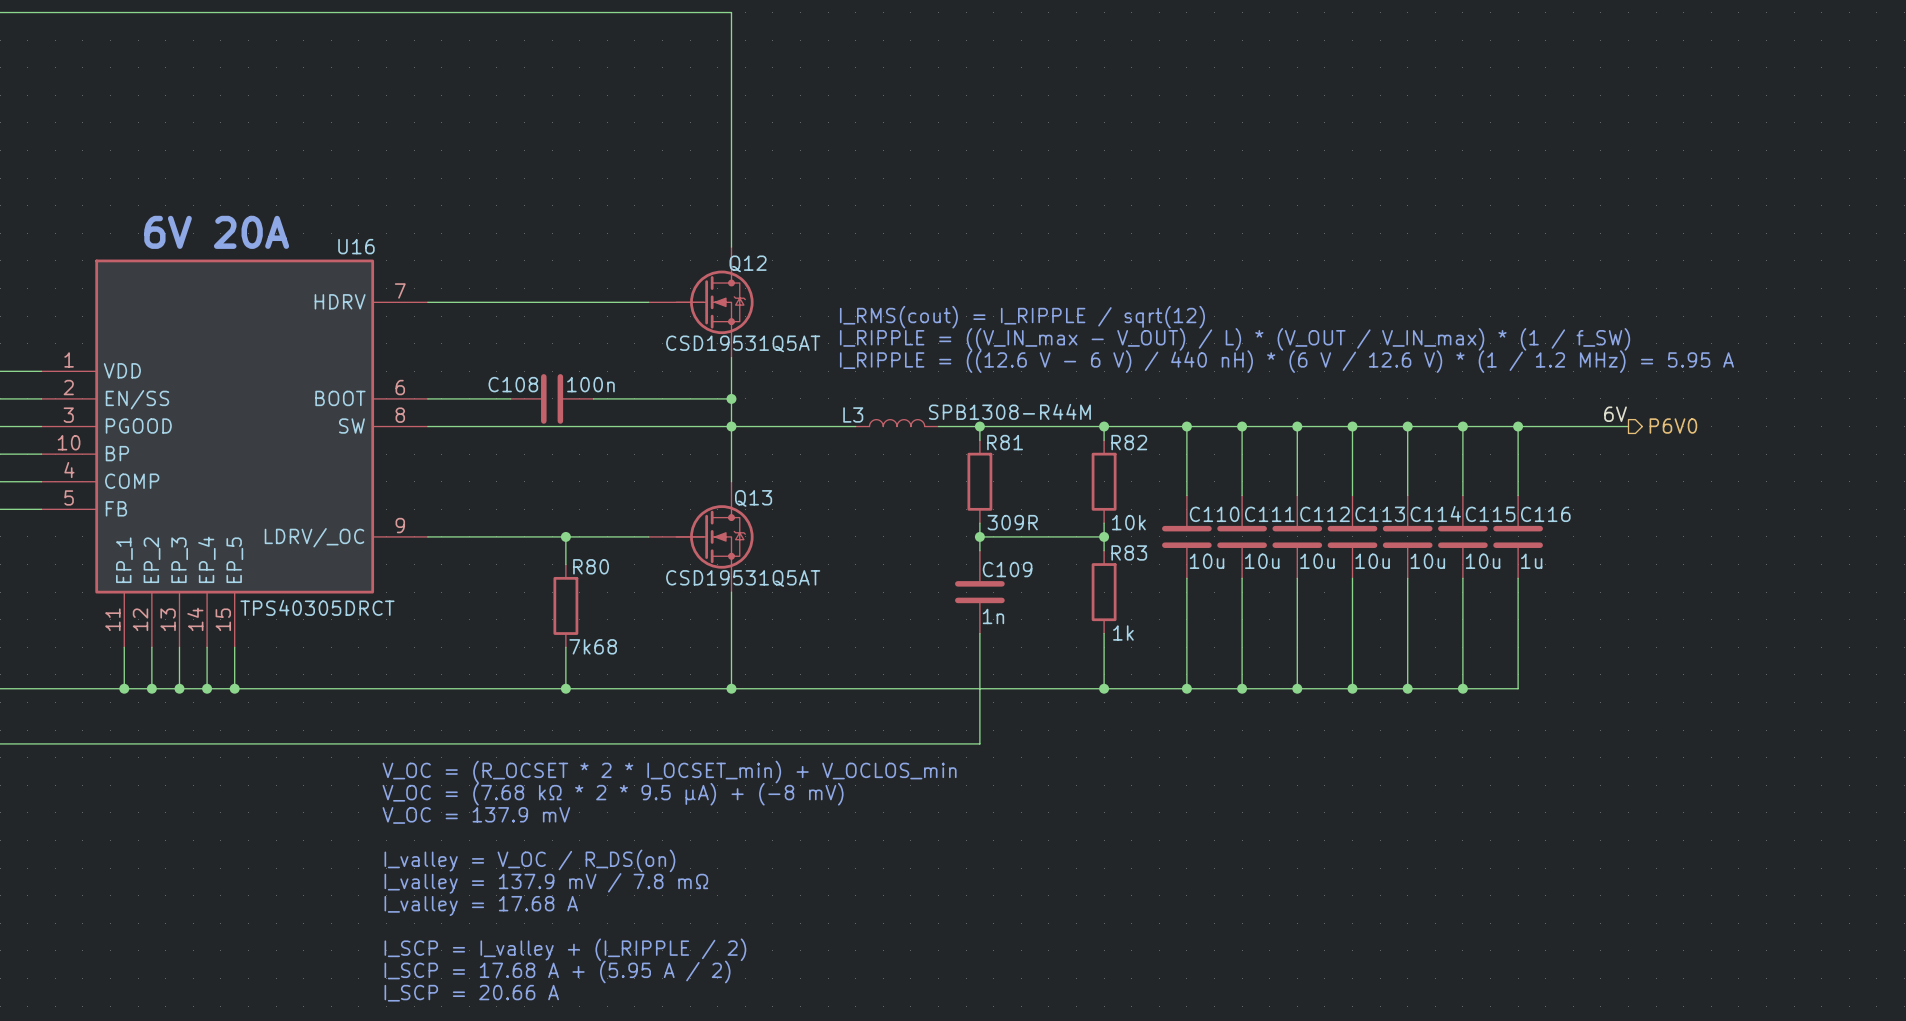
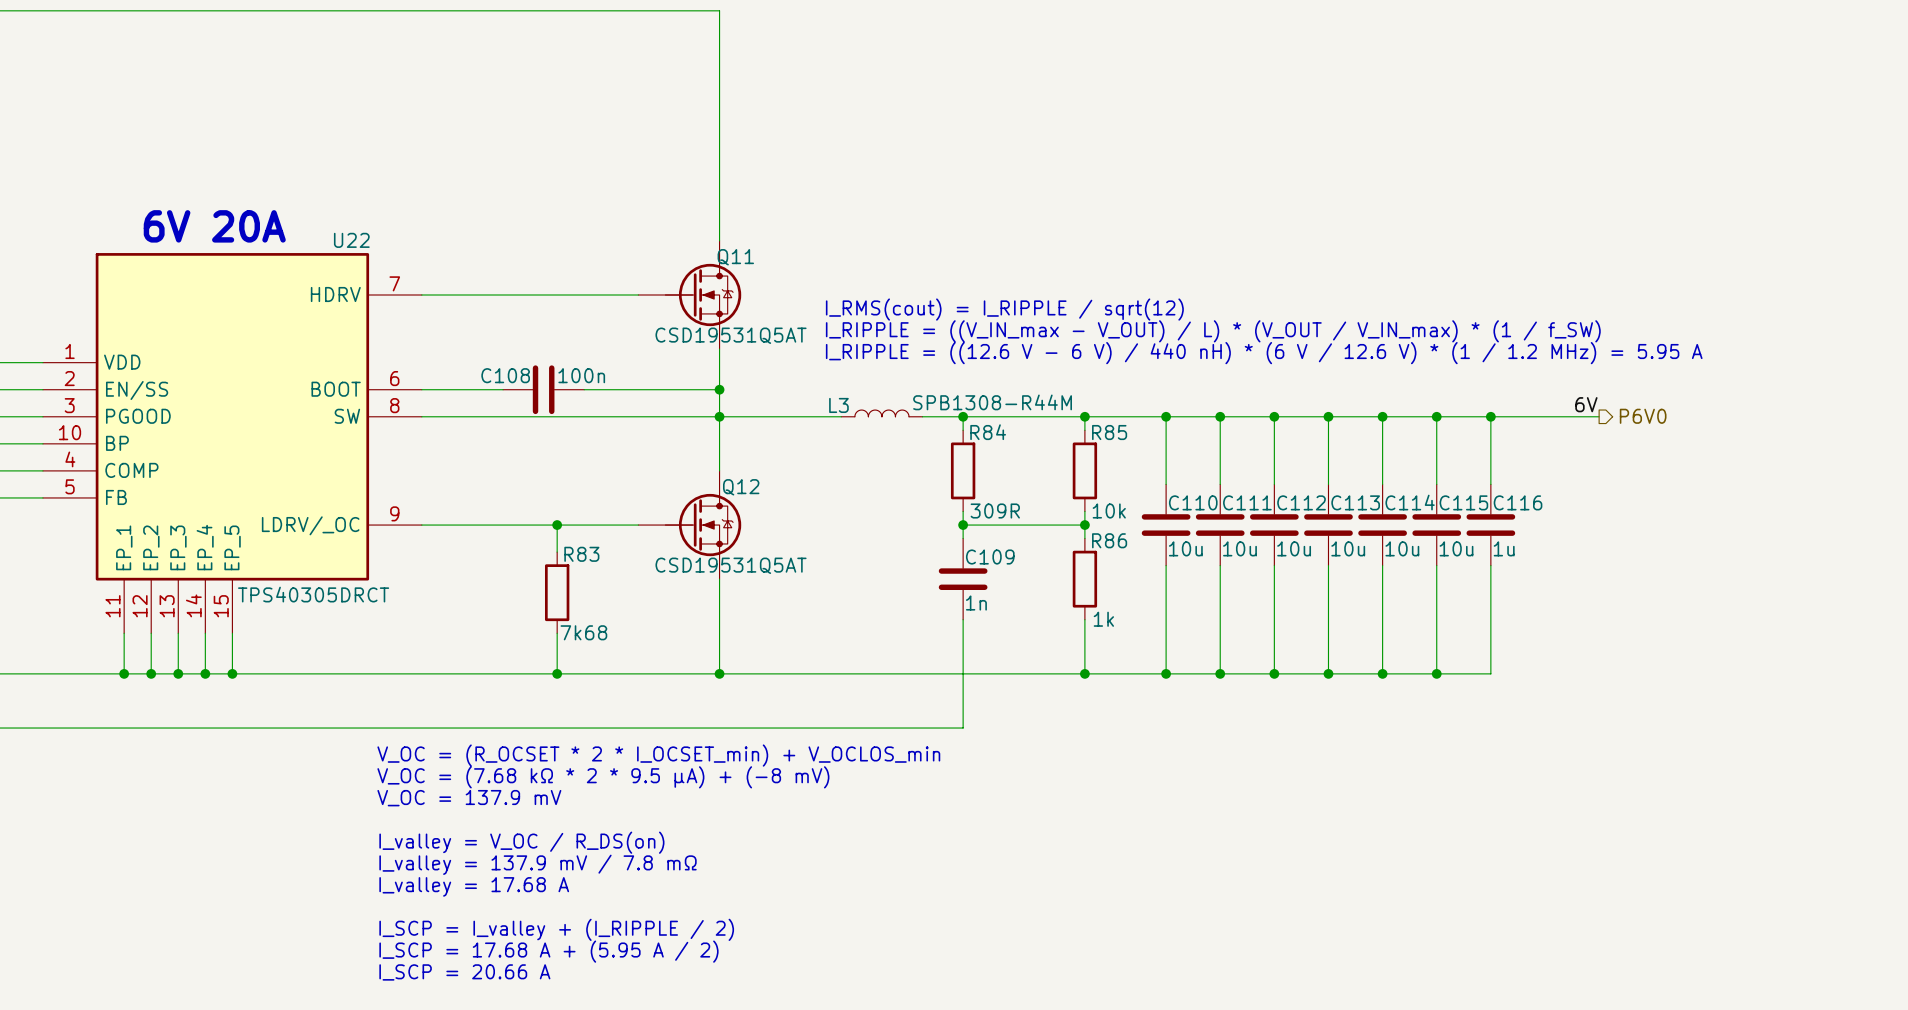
U16 name: U16 (356, 246) -> U22 (351, 240)
Q12 name: Q12 (748, 263) -> Q11 (735, 257)
R81 name: R81 (1005, 442) -> R84 (988, 432)
R82 name: R82 (1129, 442) -> R85 (1109, 432)
Q13 name: Q13 (753, 498) -> Q12 (741, 487)
R83 name: R83 (1129, 552) -> R86 (1109, 540)
R80 name: R80 (591, 566) -> R83 (581, 554)

